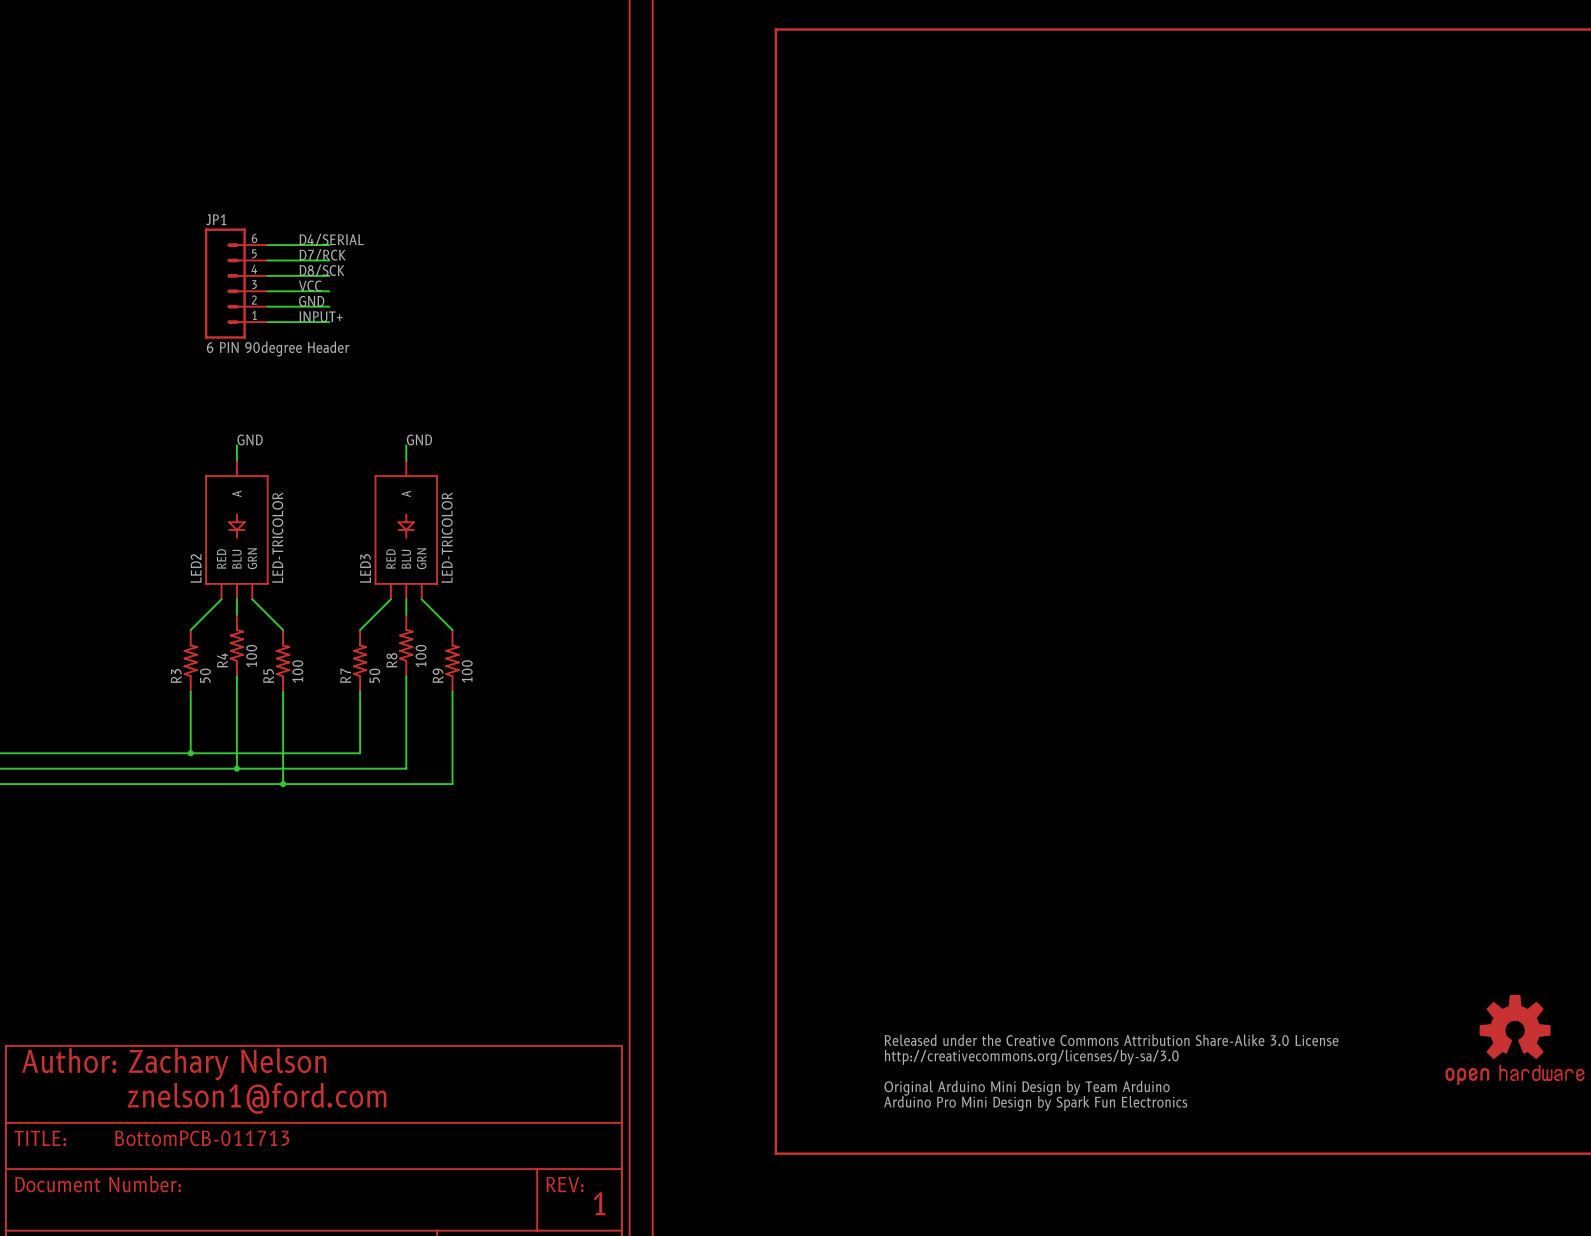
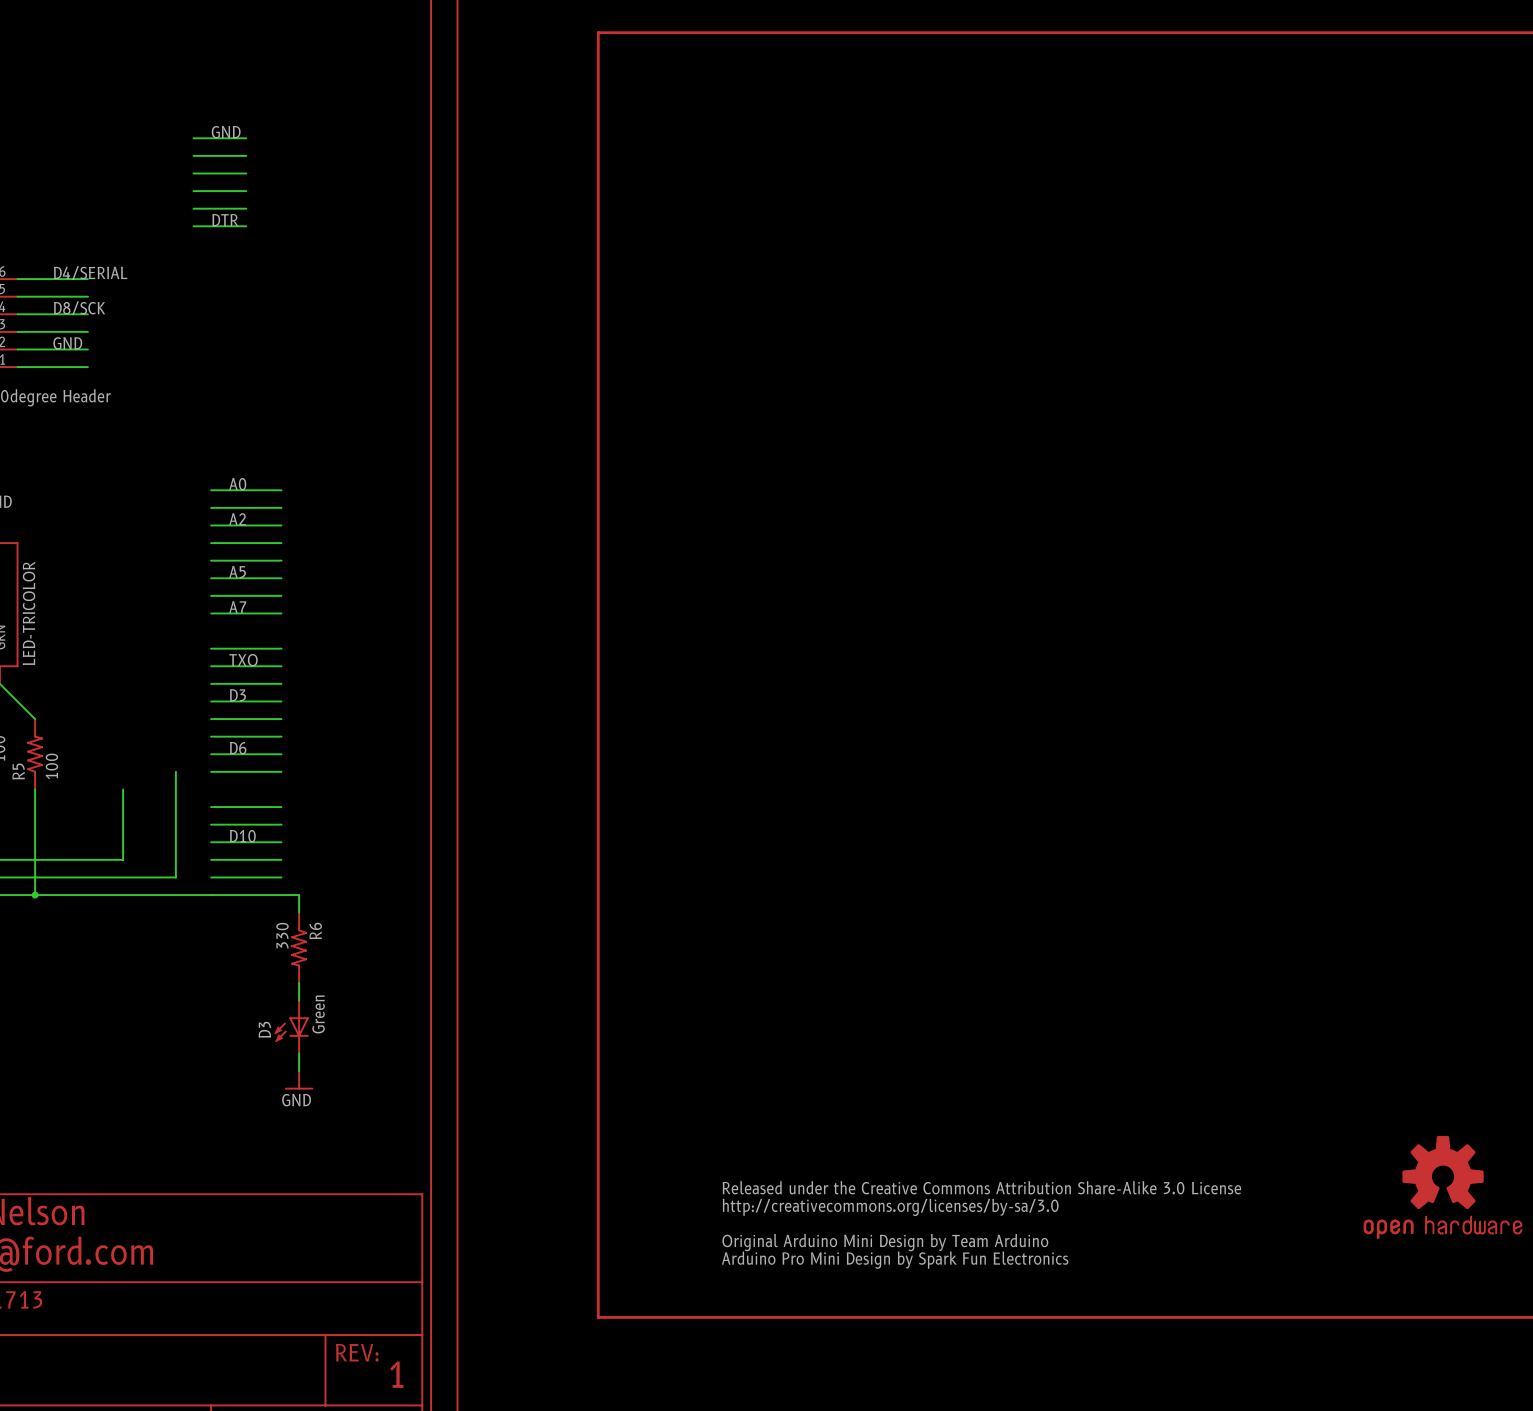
label: none -> GND (226, 132)
wire: none -> (193, 138) (246, 138)
wire: none -> (193, 155) (246, 155)
wire: none -> (193, 173) (246, 173)
wire: none -> (193, 191) (246, 191)
wire: none -> (193, 208) (246, 208)
label: none -> DTR (225, 220)
wire: none -> (193, 226) (246, 226)
label: D7/RCK (322, 255) -> none
label: VCC (310, 285) -> none
label: INPUT+ (321, 316) -> none
label: none -> A0 (237, 484)
wire: none -> (211, 490) (281, 490)
label: GND (419, 439) -> none
wire: (406, 445) (406, 460) -> none
wire: none -> (211, 507) (281, 507)
label: none -> A2 (237, 519)
wire: none -> (211, 525) (281, 525)
wire: none -> (211, 543) (281, 543)
wire: none -> (211, 560) (281, 560)
label: none -> A5 (237, 572)
wire: none -> (211, 578) (281, 578)
wire: none -> (211, 595) (281, 595)
LED3: LED-TRICOLOR (406, 529) -> none
label: none -> A7 (237, 607)
wire: none -> (211, 613) (281, 613)
wire: none -> (211, 648) (281, 648)
label: none -> TXO (243, 660)
wire: none -> (211, 666) (281, 666)
wire: (390, 599) (360, 630) -> none
wire: (406, 599) (406, 614) -> none
wire: (421, 599) (452, 630) -> none
wire: none -> (211, 683) (281, 683)
label: none -> D3 (237, 695)
wire: none -> (211, 701) (281, 701)
wire: none -> (211, 719) (281, 719)
R8: 100 (406, 645) -> none
wire: none -> (211, 736) (281, 736)
label: none -> D6 (238, 748)
R7: 50 (360, 660) -> none
wire: none -> (211, 754) (281, 754)
R9: 100 (452, 660) -> none
wire: none -> (211, 771) (281, 771)
wire: (452, 691) (452, 784) -> (299, 912) (299, 895) (228, 895)
wire: none -> (211, 807) (281, 807)
wire: none -> (211, 824) (281, 824)
label: none -> D10 (242, 836)
wire: none -> (211, 842) (281, 842)
wire: none -> (211, 859) (281, 859)
wire: none -> (211, 877) (281, 877)
R6: none -> 330 (299, 947)
wire: none -> (299, 983) (299, 1000)
D3: none -> Green (291, 1027)
wire: none -> (299, 1053) (299, 1071)
power symbol: none -> GND (299, 1080)

